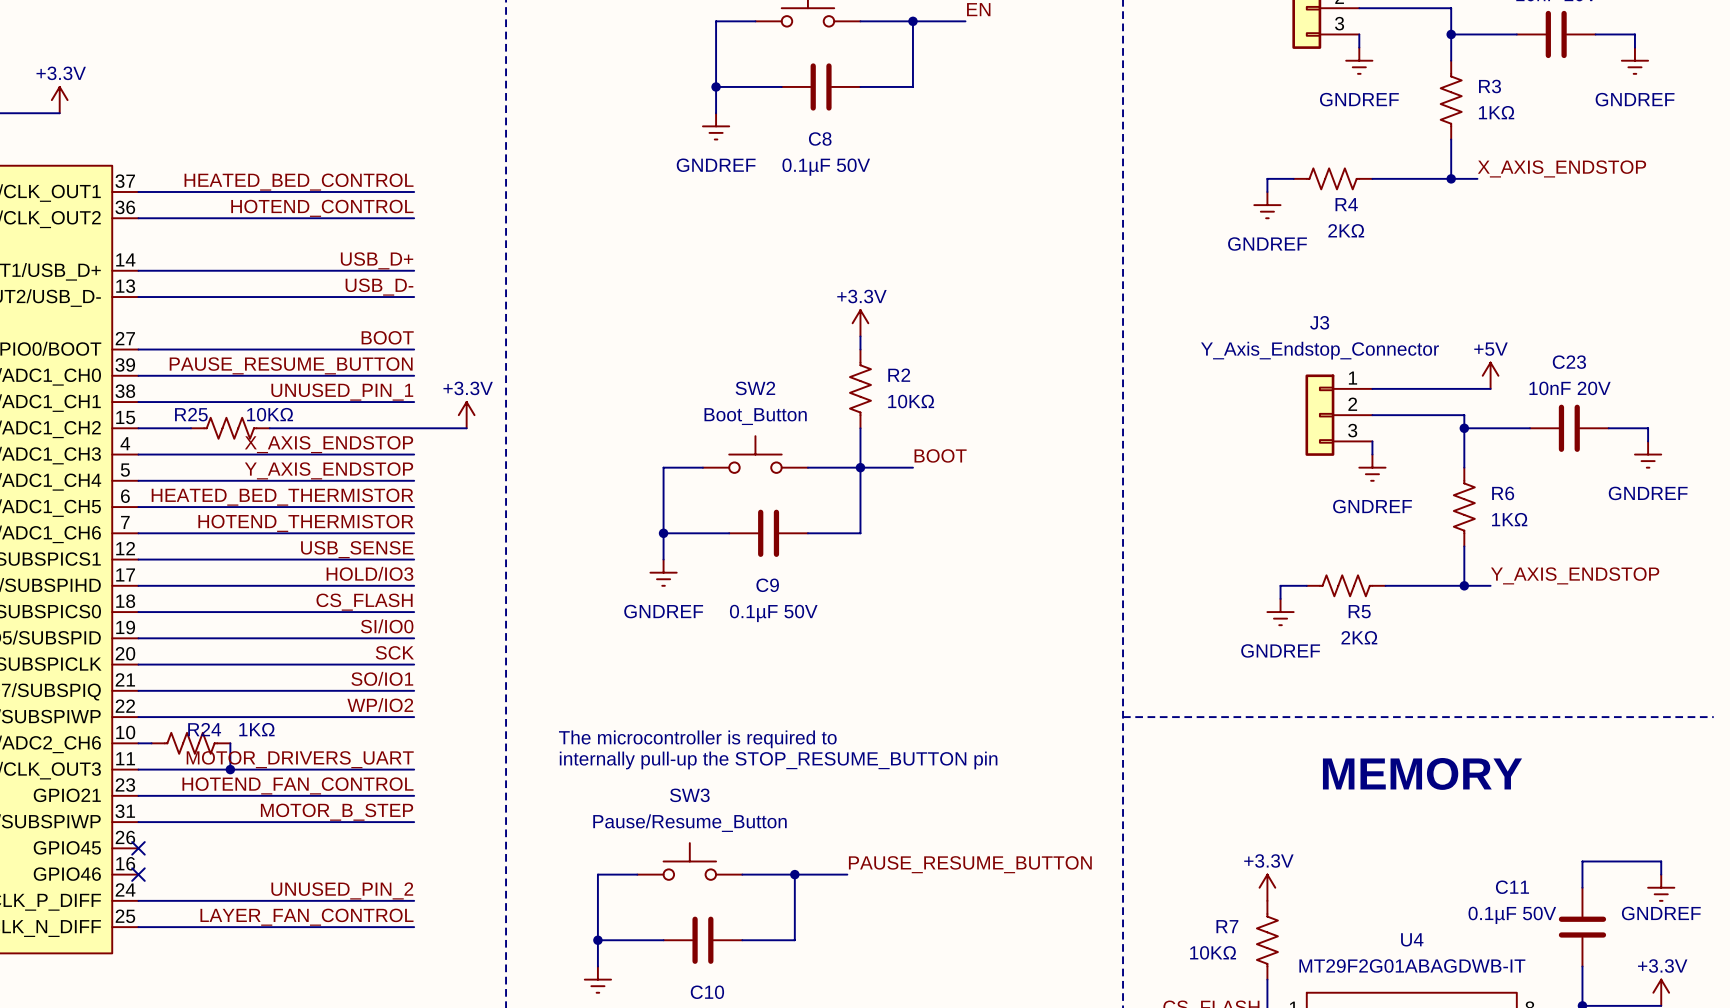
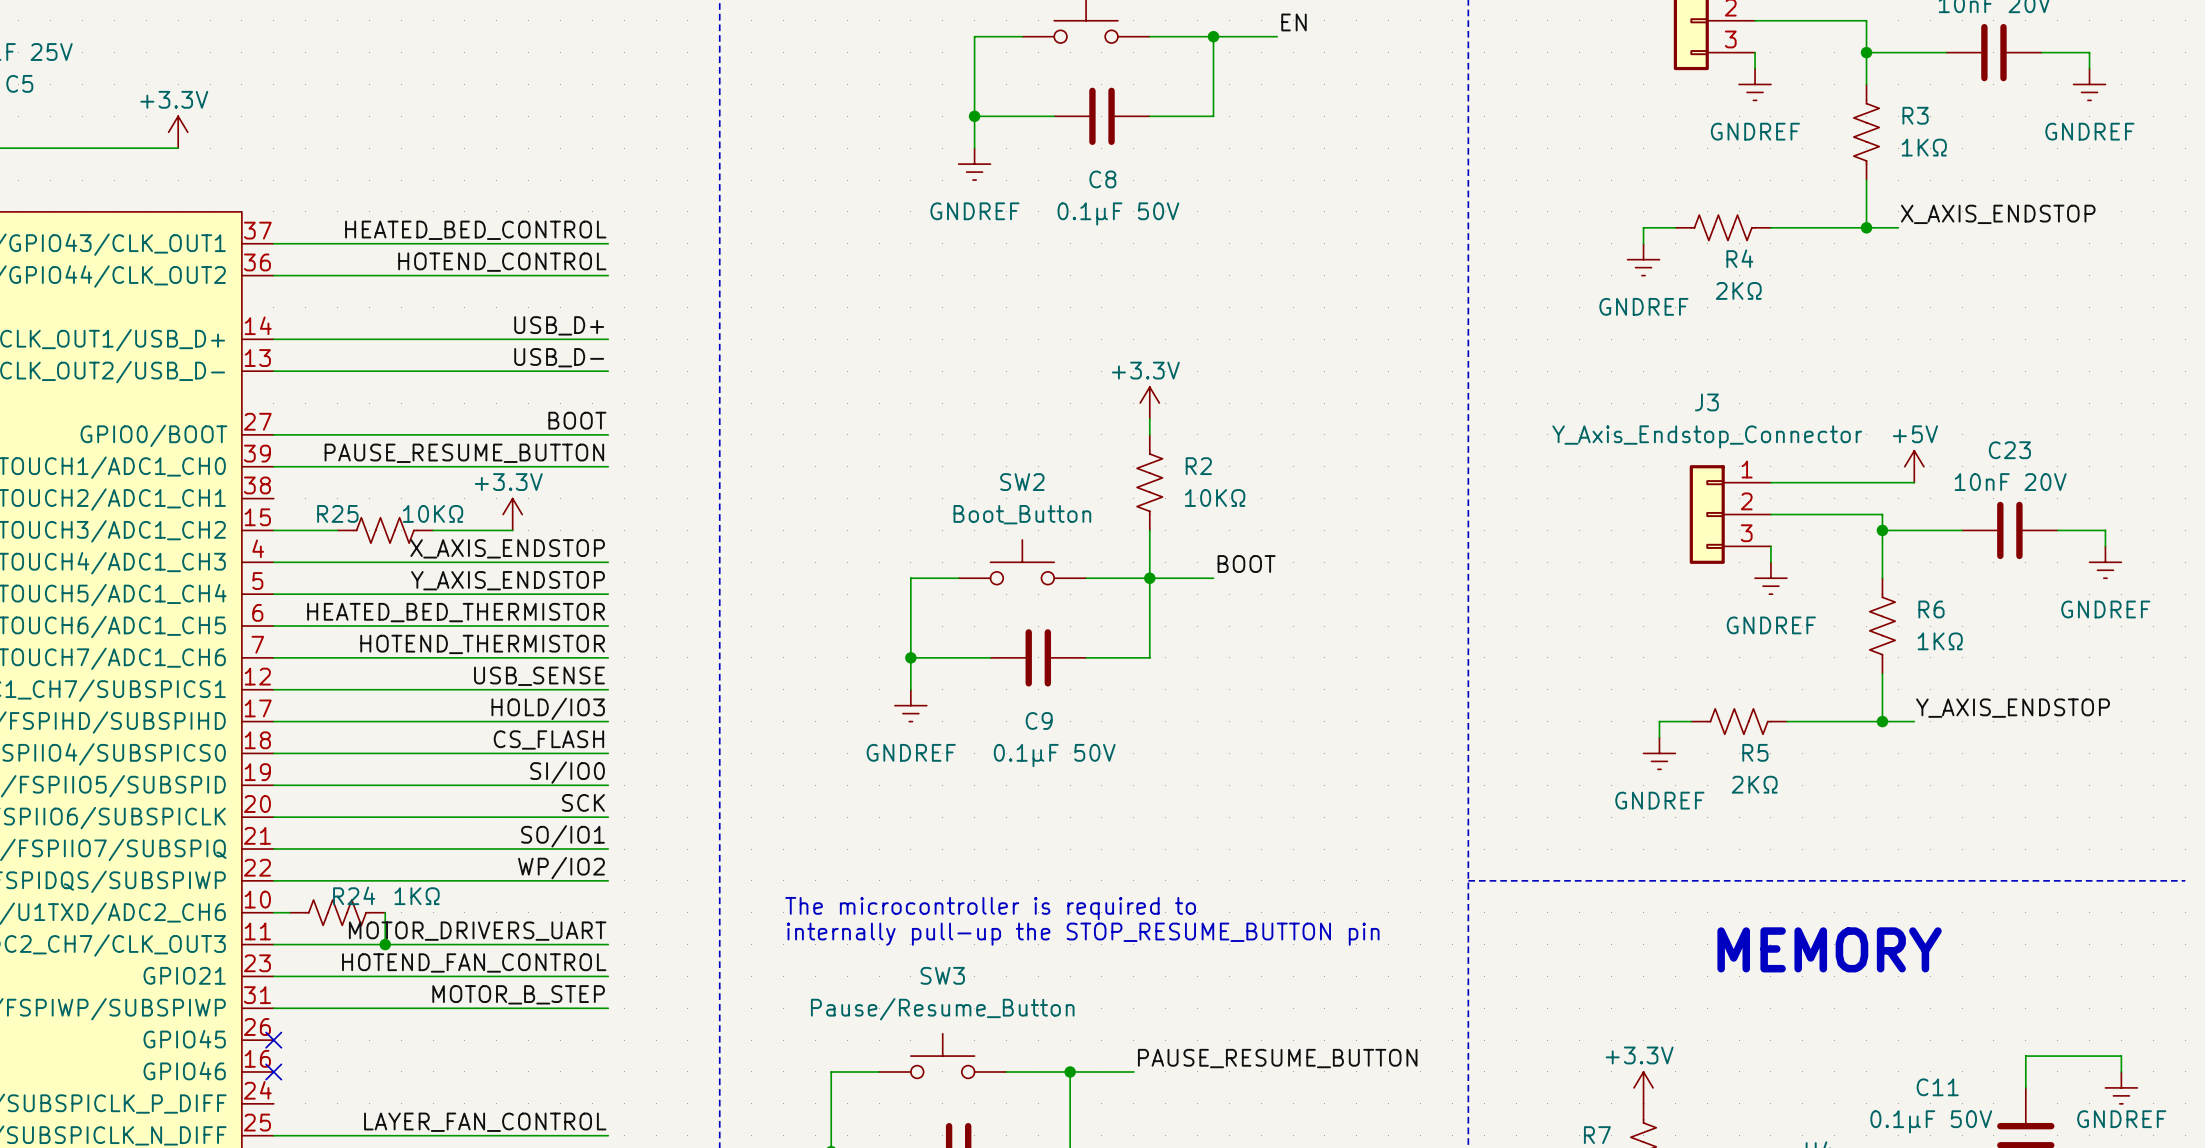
label: UNUSED_PIN_1 (342, 392) -> none
wire: (138, 402) (414, 402) -> none
power symbol position: +3.3V (466, 415) -> +3.3V (512, 514)
wire: (335, 428) (466, 428) -> none
label: UNUSED_PIN_2 (342, 890) -> none
wire: (138, 900) (414, 900) -> none

